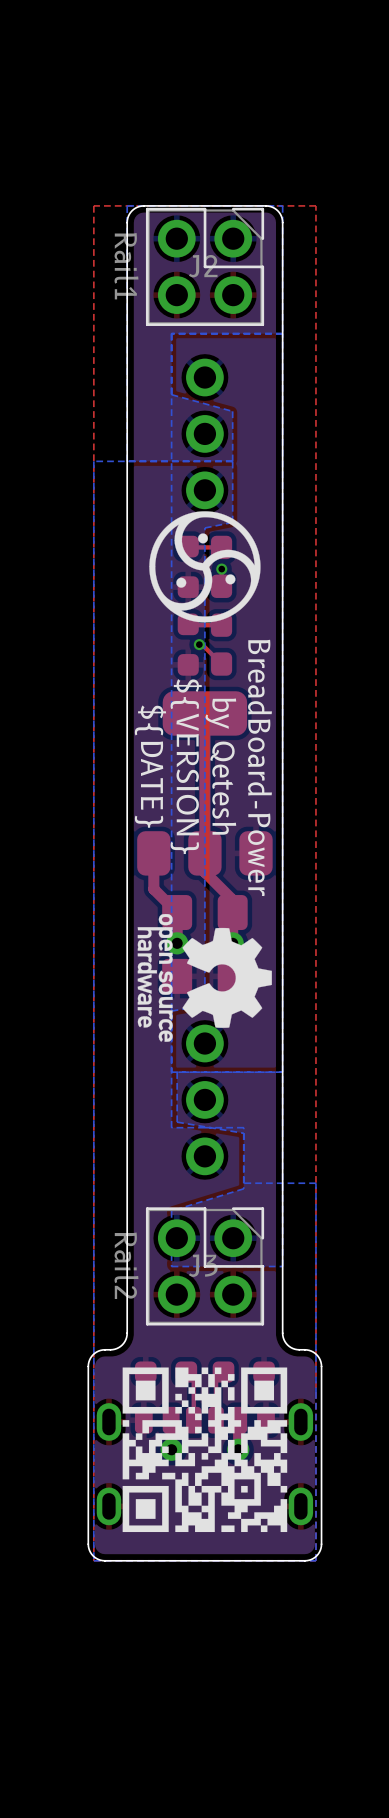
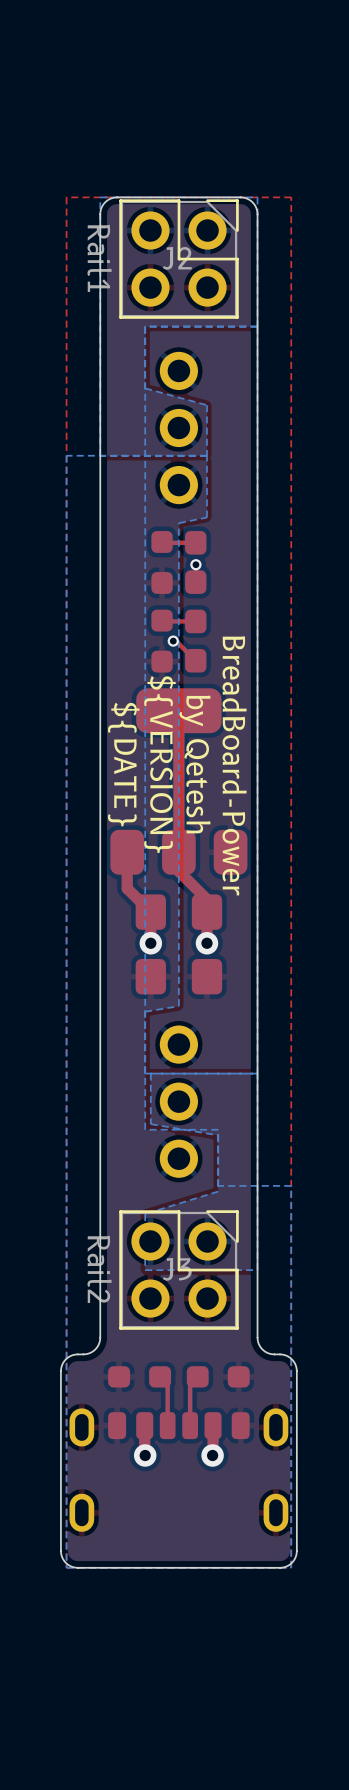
drawing: [149, 511, 261, 623] -> none
drawing: [137, 913, 272, 1042] -> none
drawing: [122, 1367, 288, 1533] -> none

